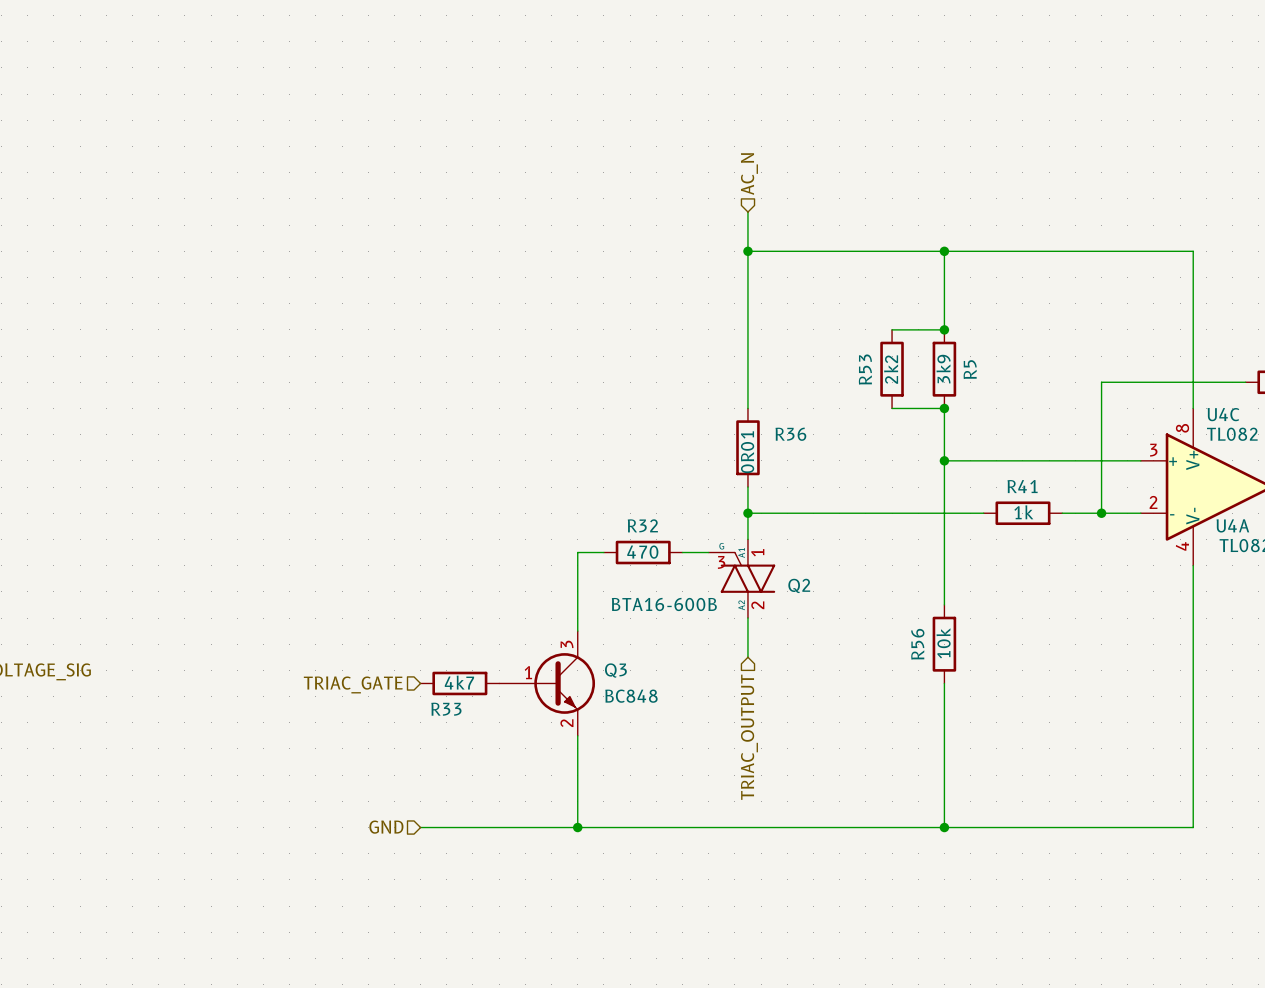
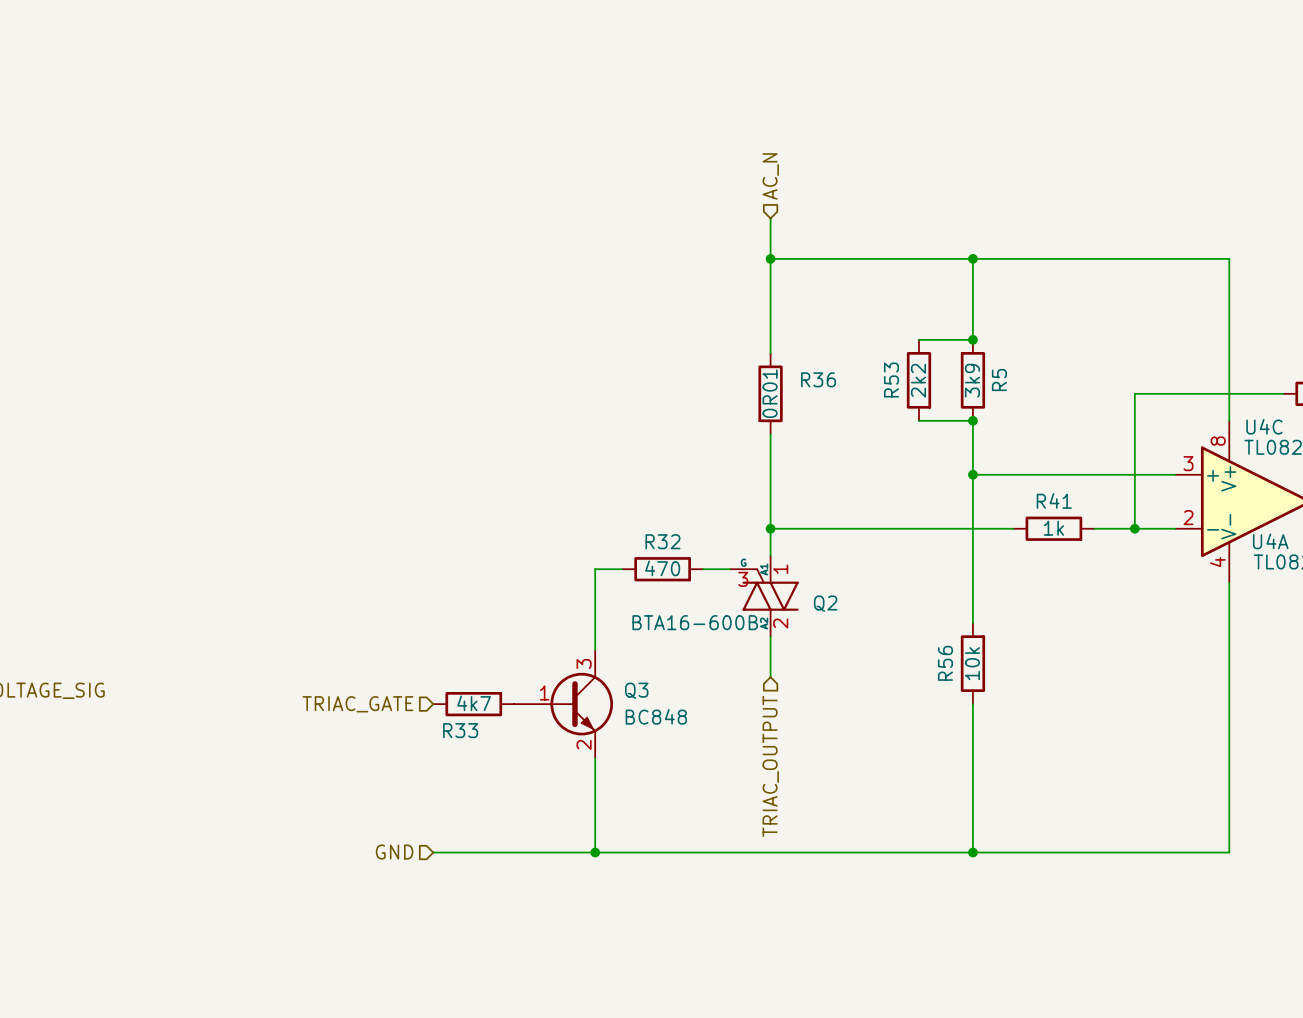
wire: (747, 342) (747, 408) -> (770, 434) (770, 501)
R36 position: (747, 447) -> (770, 393)

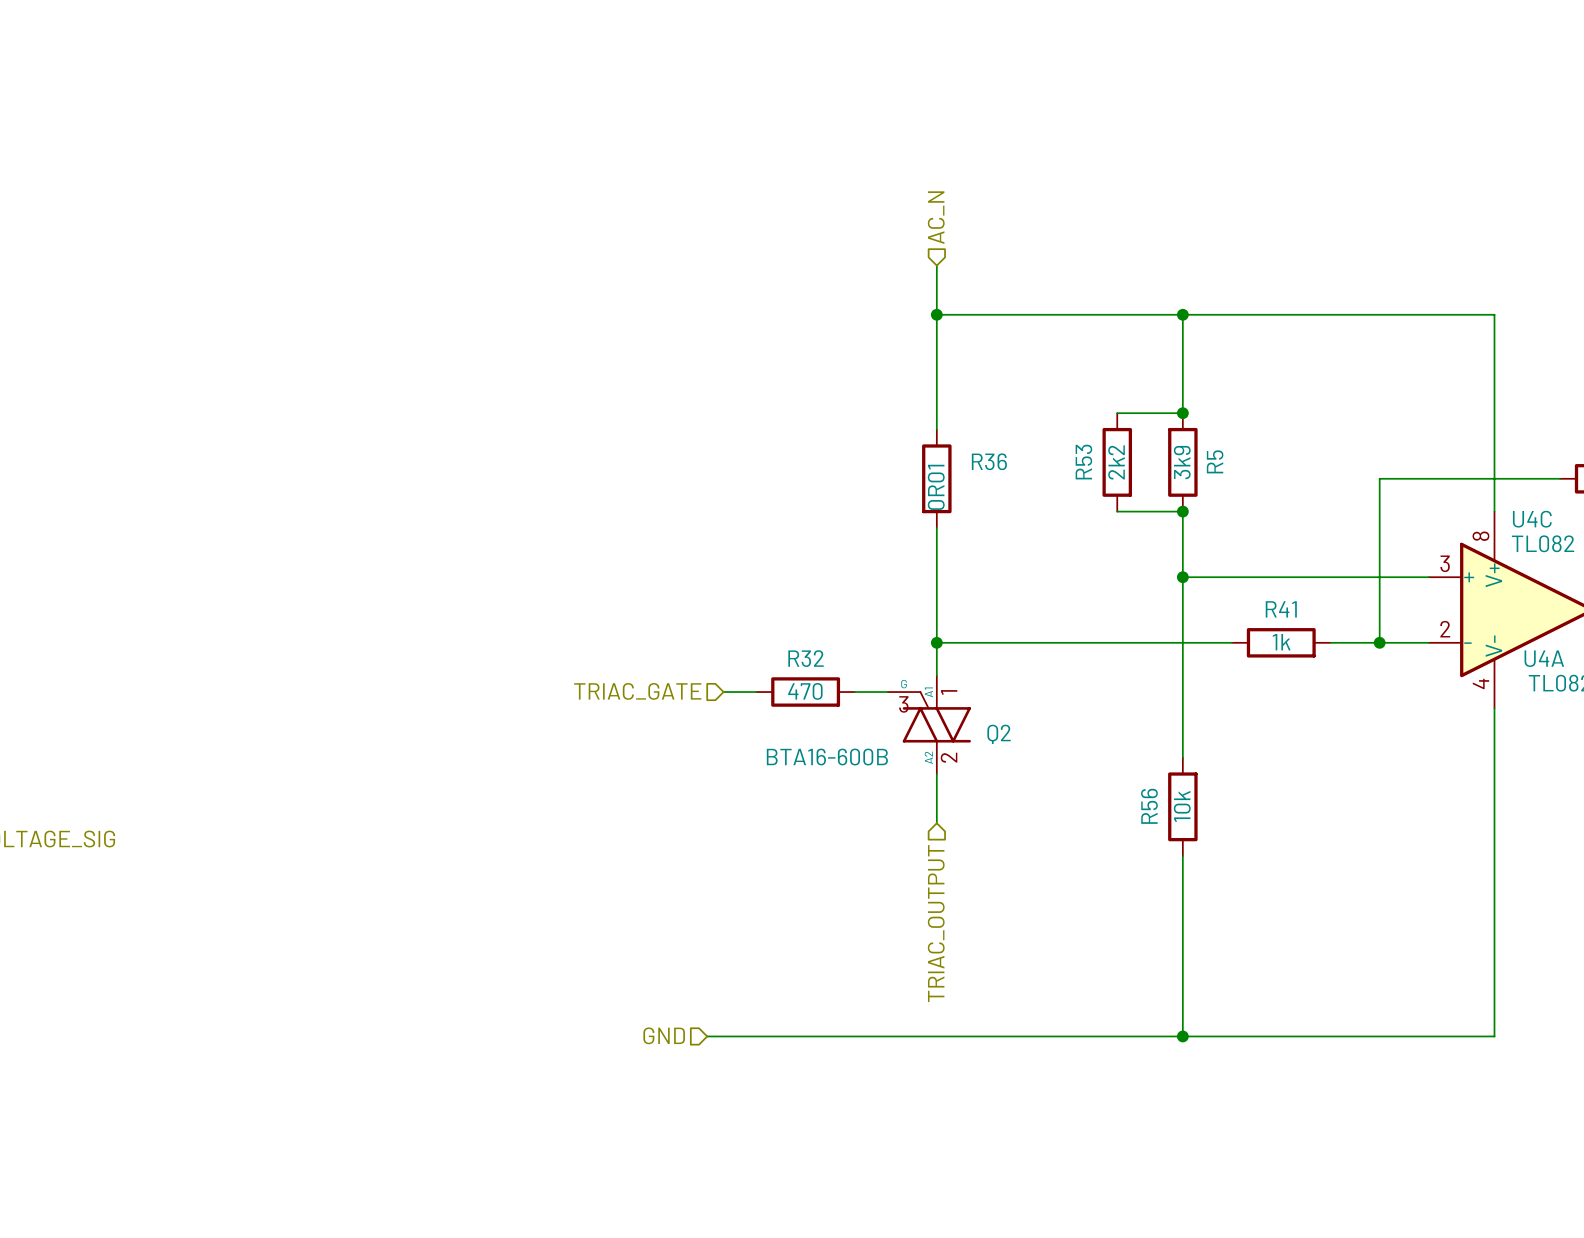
wire: (595, 569) (595, 650) -> none
hierarchical label position: TRIAC_GATE (357, 704) -> TRIAC_GATE (637, 691)
R33: 4k7 (473, 704) -> none
Q3: BC848 (563, 704) -> none
wire: (595, 758) (595, 852) -> none
hierarchical label position: GND (394, 852) -> GND (664, 1035)
wire: (433, 852) (581, 852) -> none
junction: (595, 852) -> none

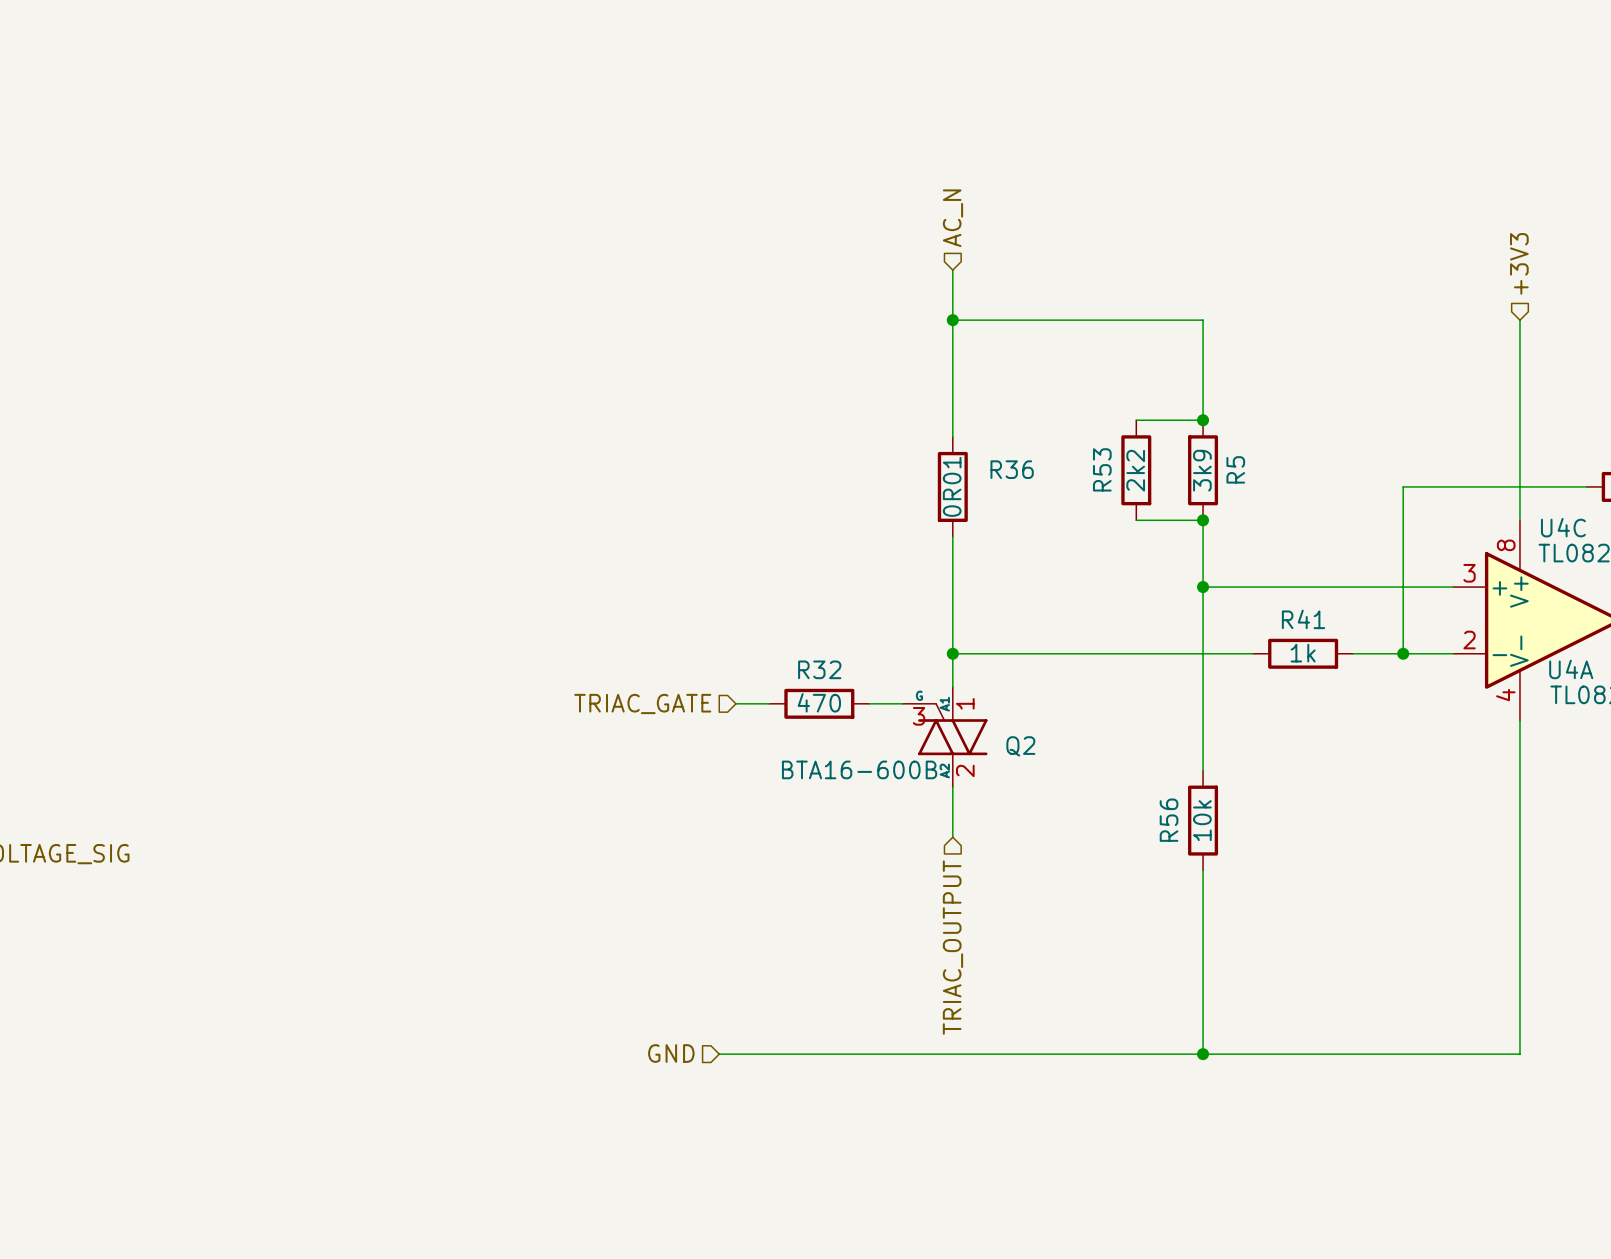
hierarchical label: none -> +3V3 (1519, 263)
wire: (1182, 314) (1494, 314) -> none
junction: (1182, 314) -> none

